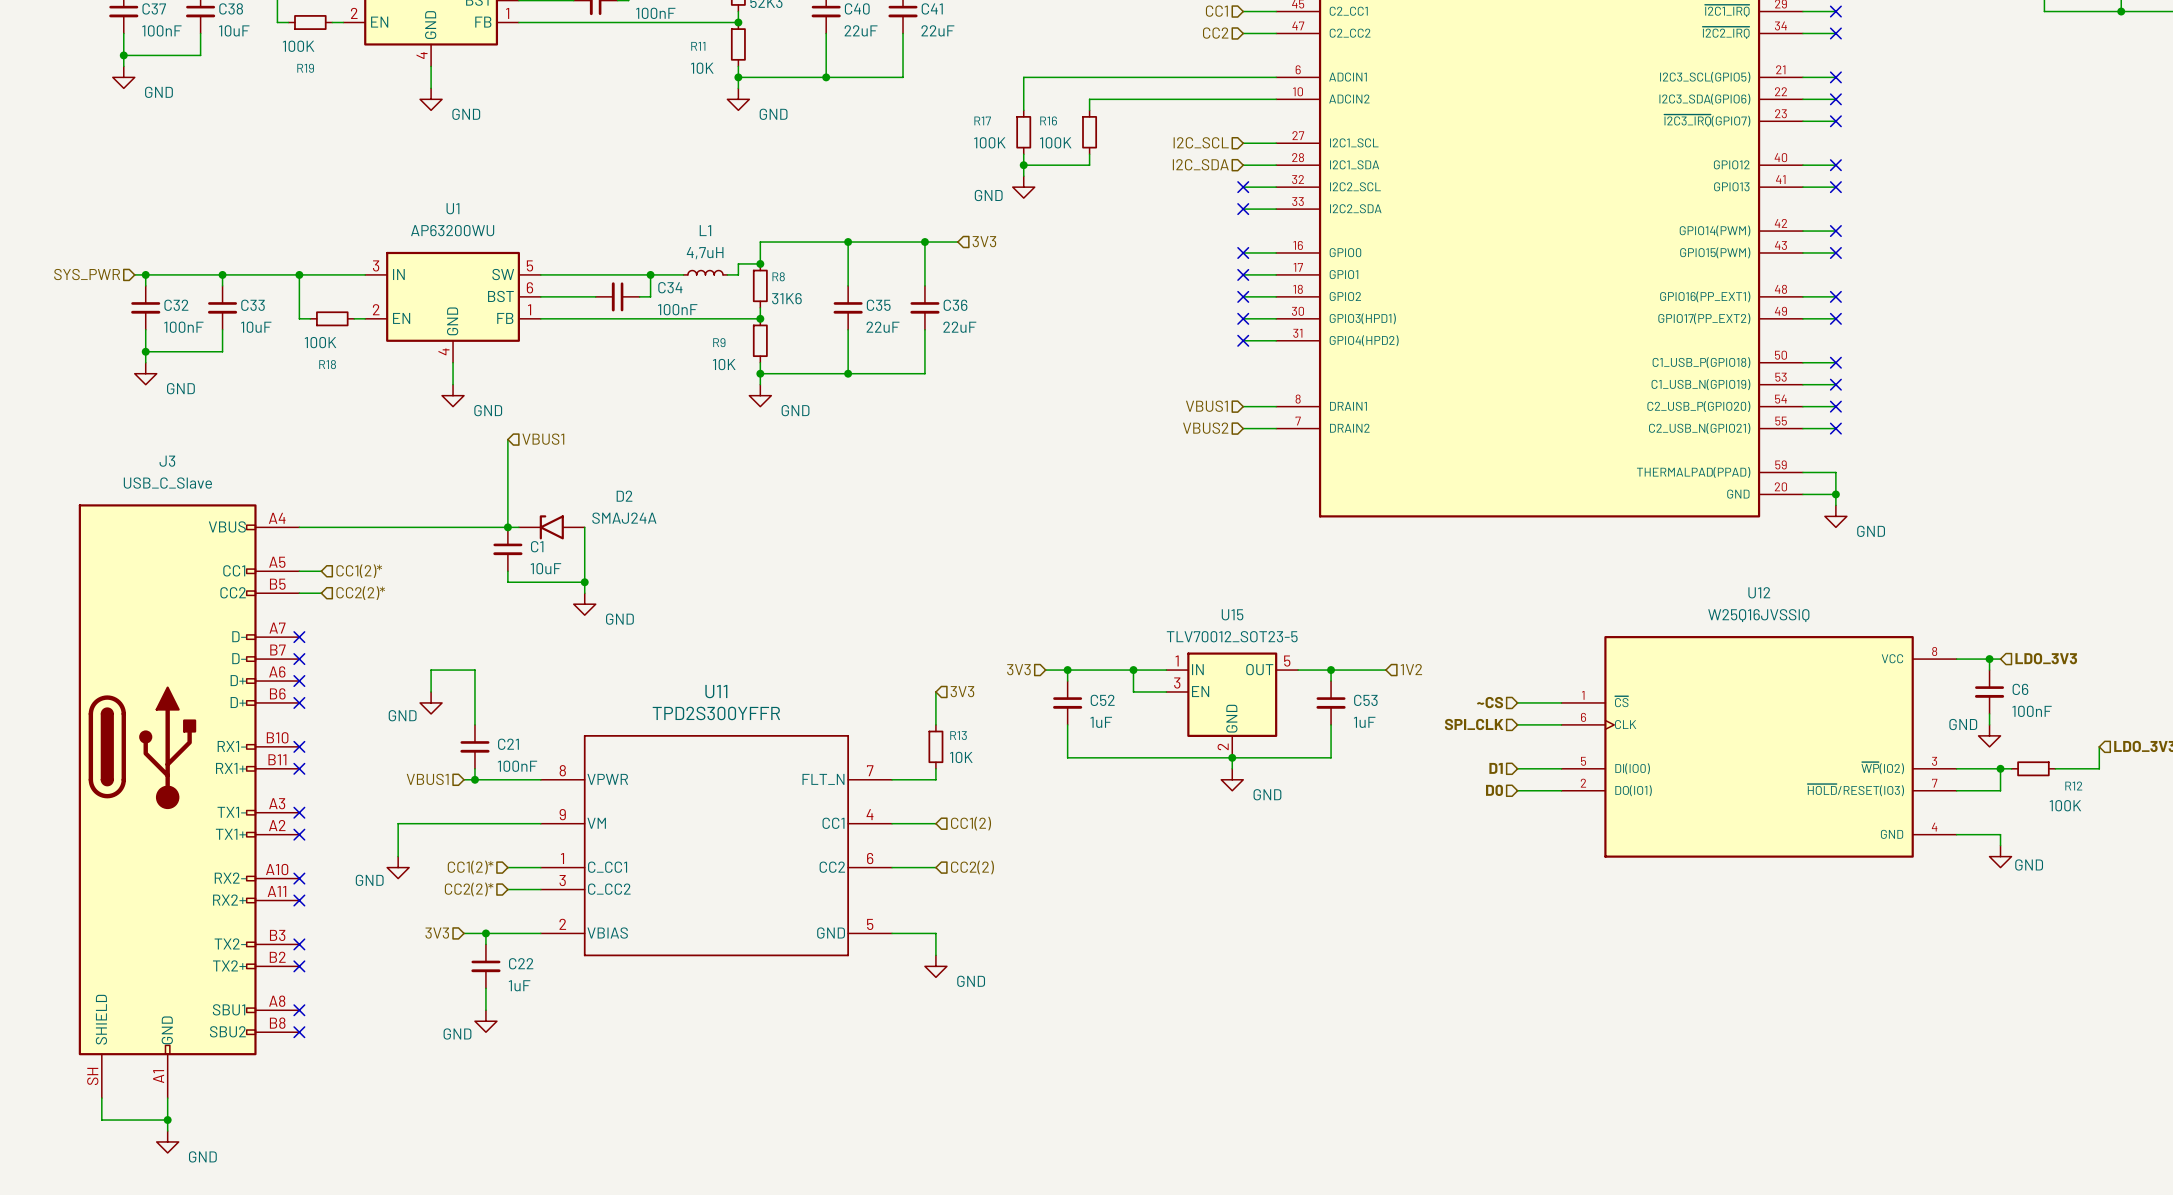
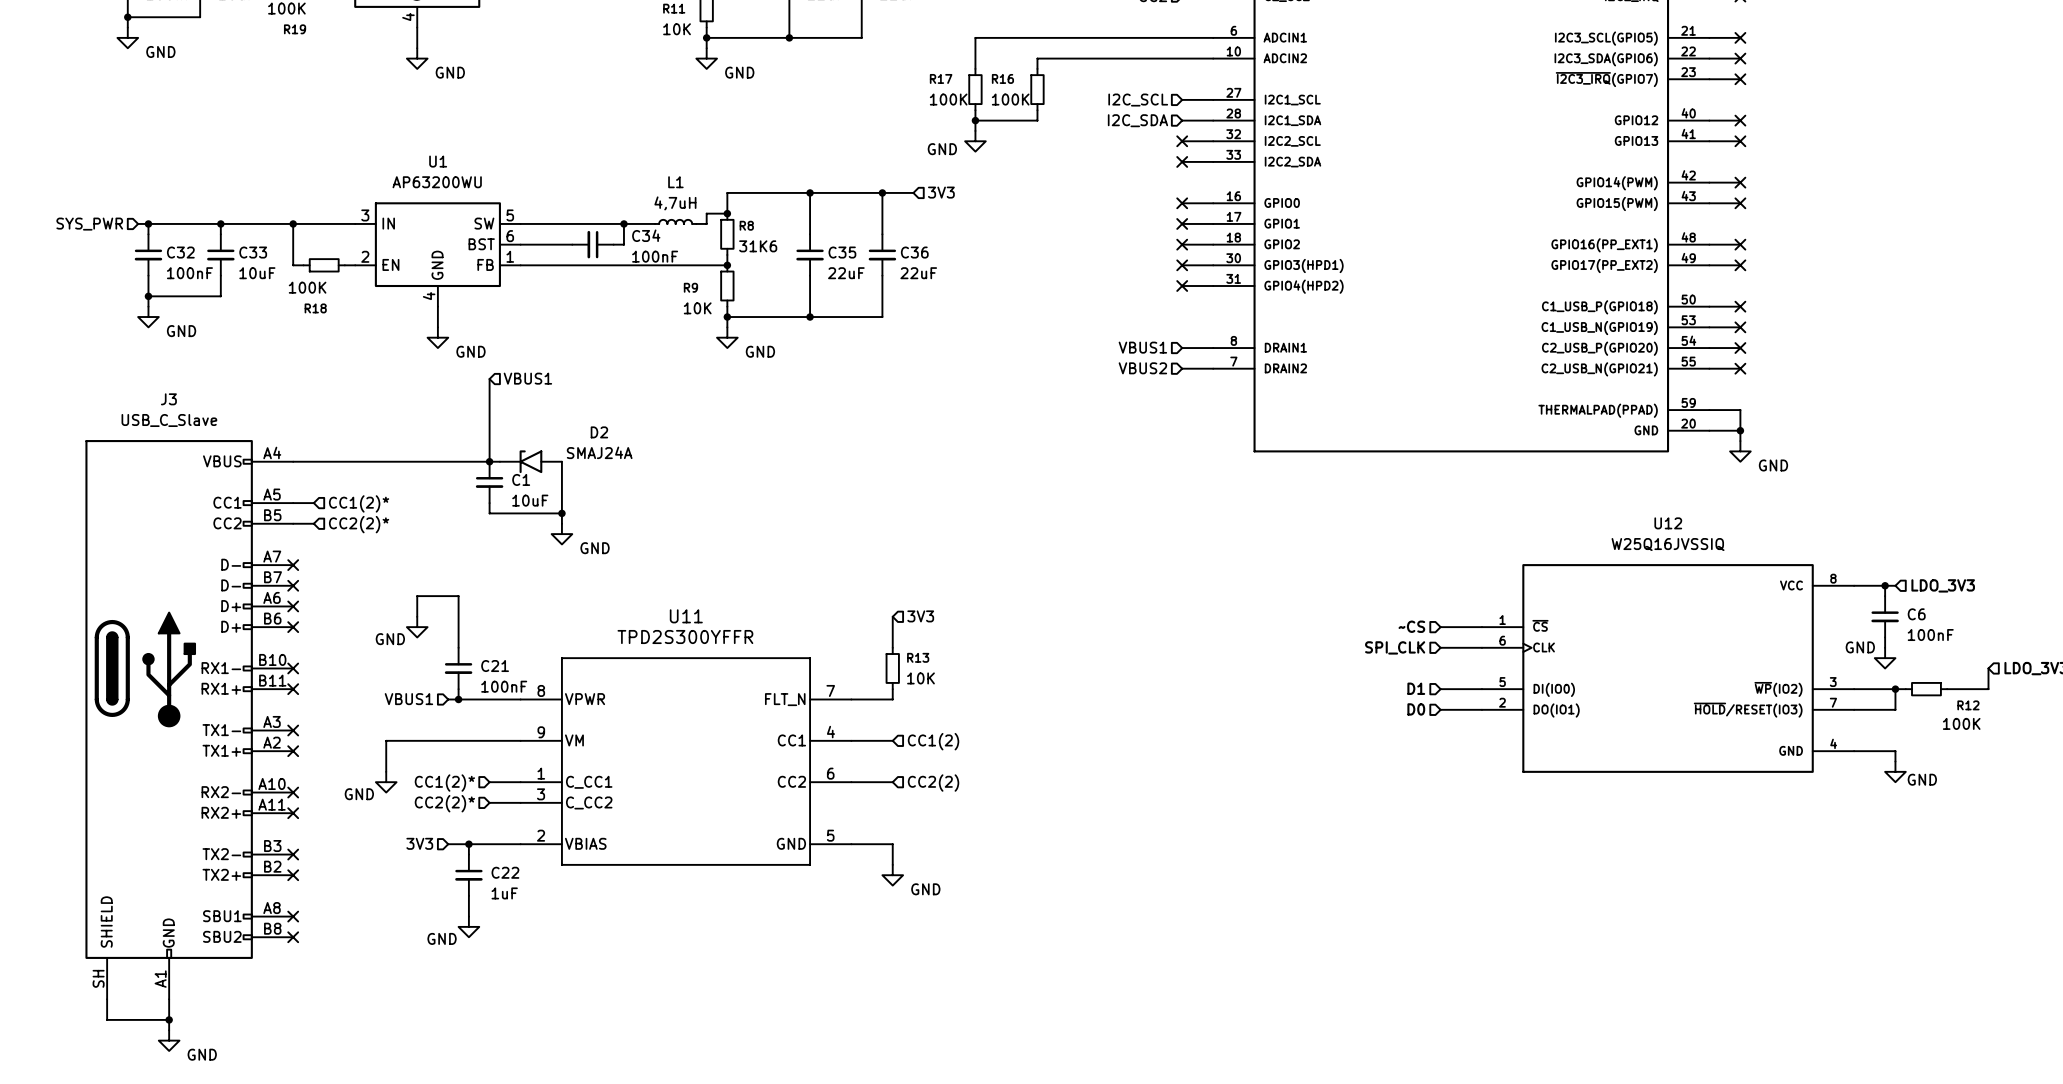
hierarchical label: 3V3 (1018, 669) -> none
hierarchical label: 1V2 (1411, 669) -> none
wire: (1045, 670) (1166, 670) -> none
wire: (1067, 670) (1067, 681) -> none
junction: (1067, 670) -> none
wire: (1133, 670) (1133, 691) (1166, 691) -> none
junction: (1133, 670) -> none
wire: (1298, 670) (1385, 670) -> none
wire: (1331, 670) (1331, 681) -> none
junction: (1331, 670) -> none
C52: 1uF (1067, 702) -> none
C53: 1uF (1331, 702) -> none
U15: TLV70012_SOT23-5 (1232, 705) -> none
wire: (1067, 724) (1067, 757) (1331, 757) (1331, 724) -> none
wire: (1232, 757) (1232, 768) -> none
junction: (1232, 757) -> none
power symbol: GND (1232, 779) -> none

